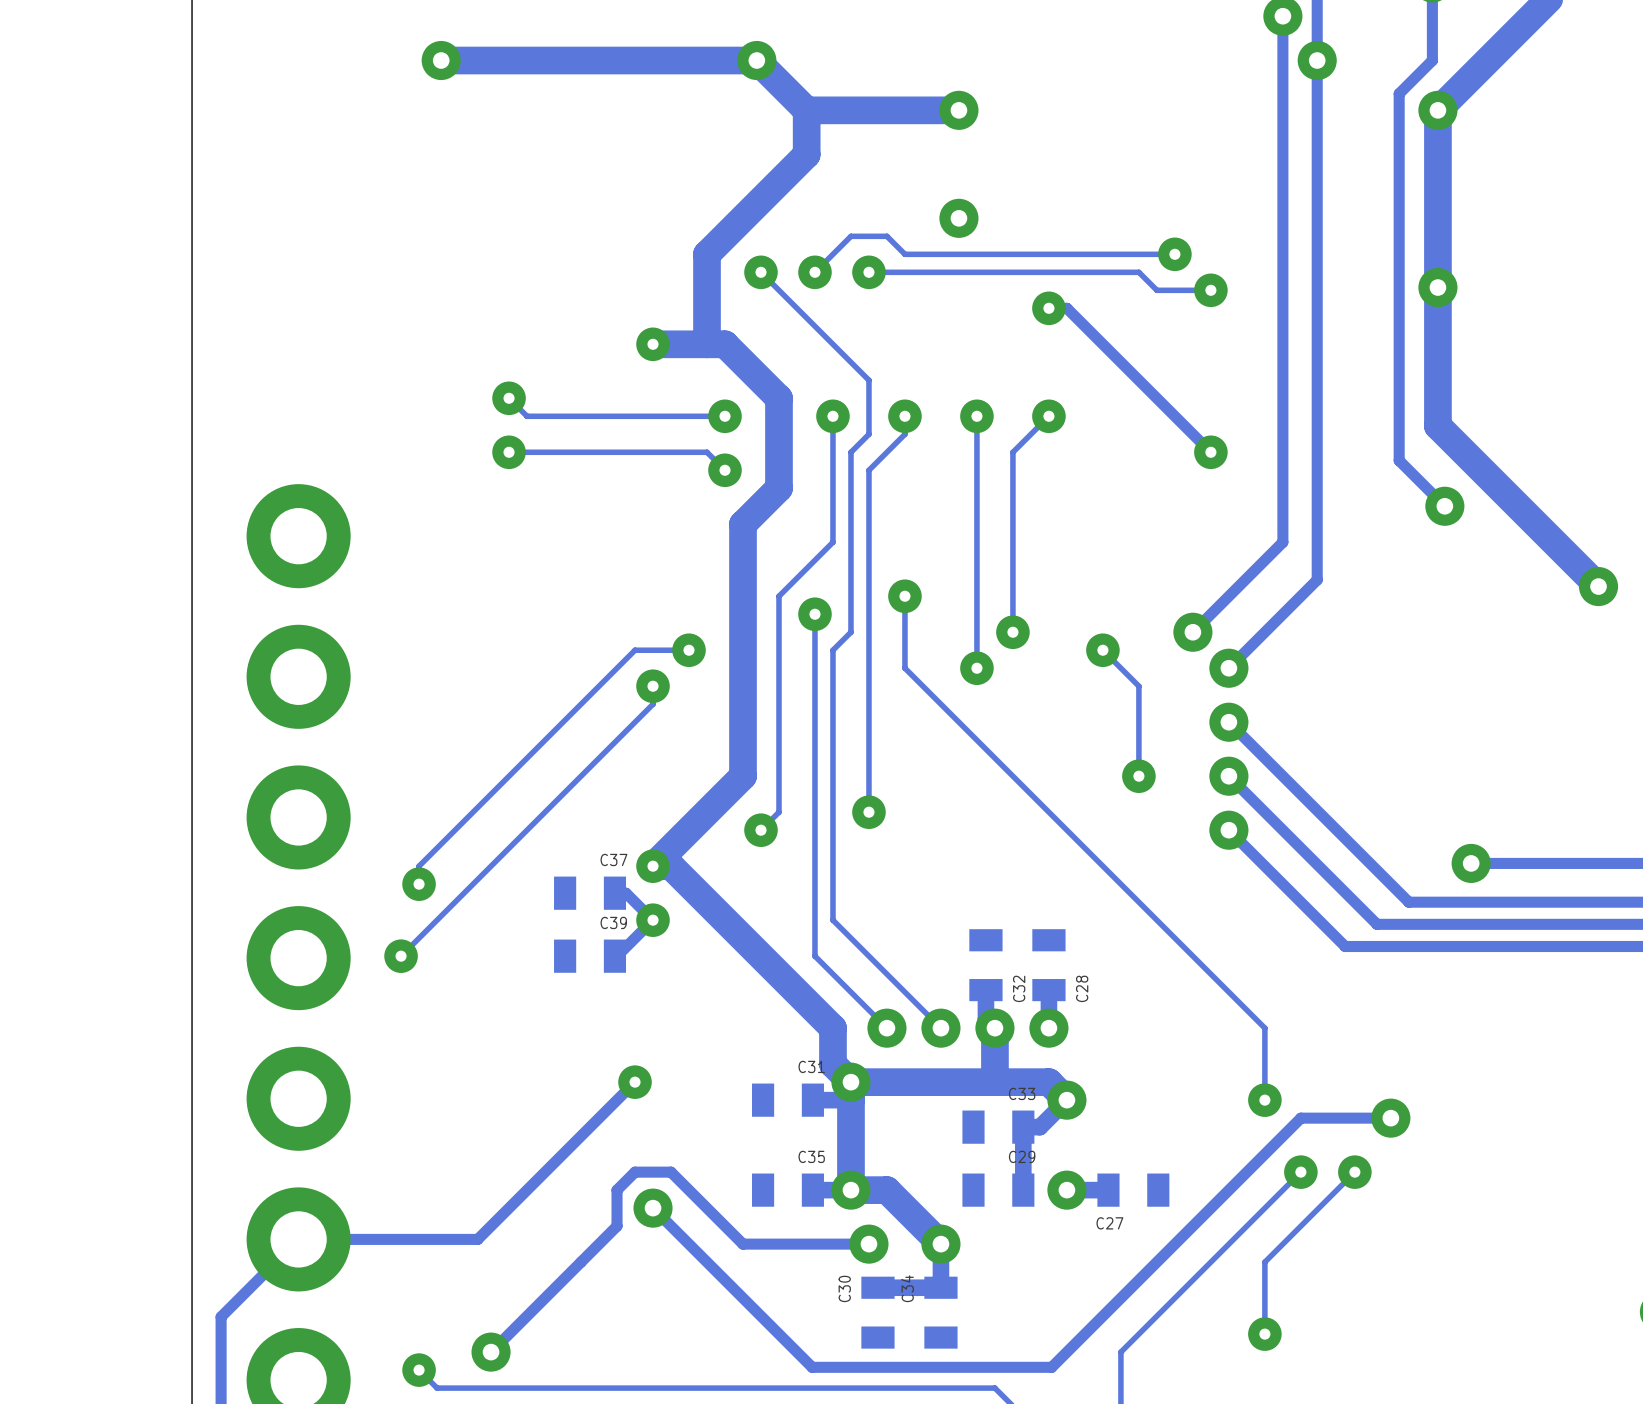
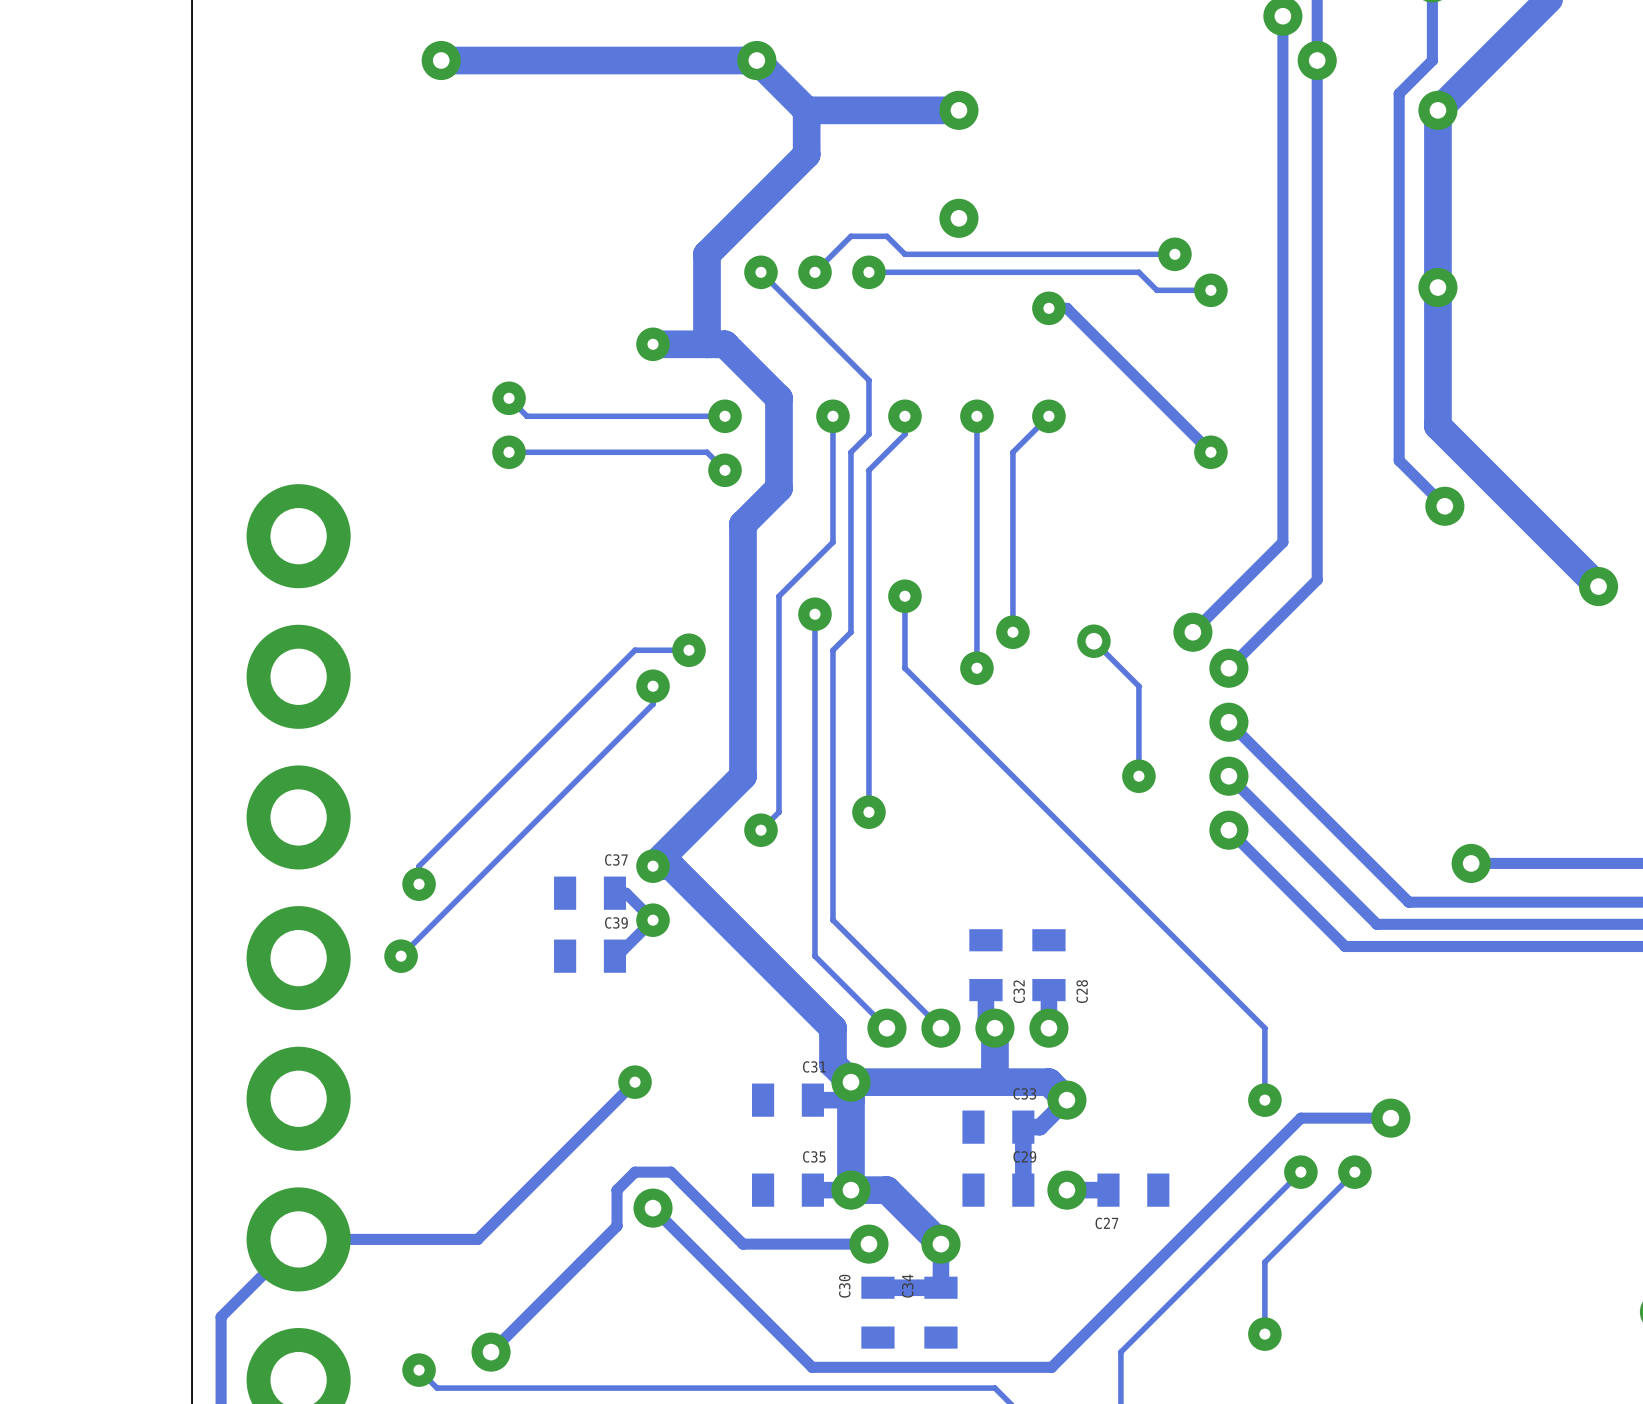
via position: (1102, 650) -> (1093, 641)

